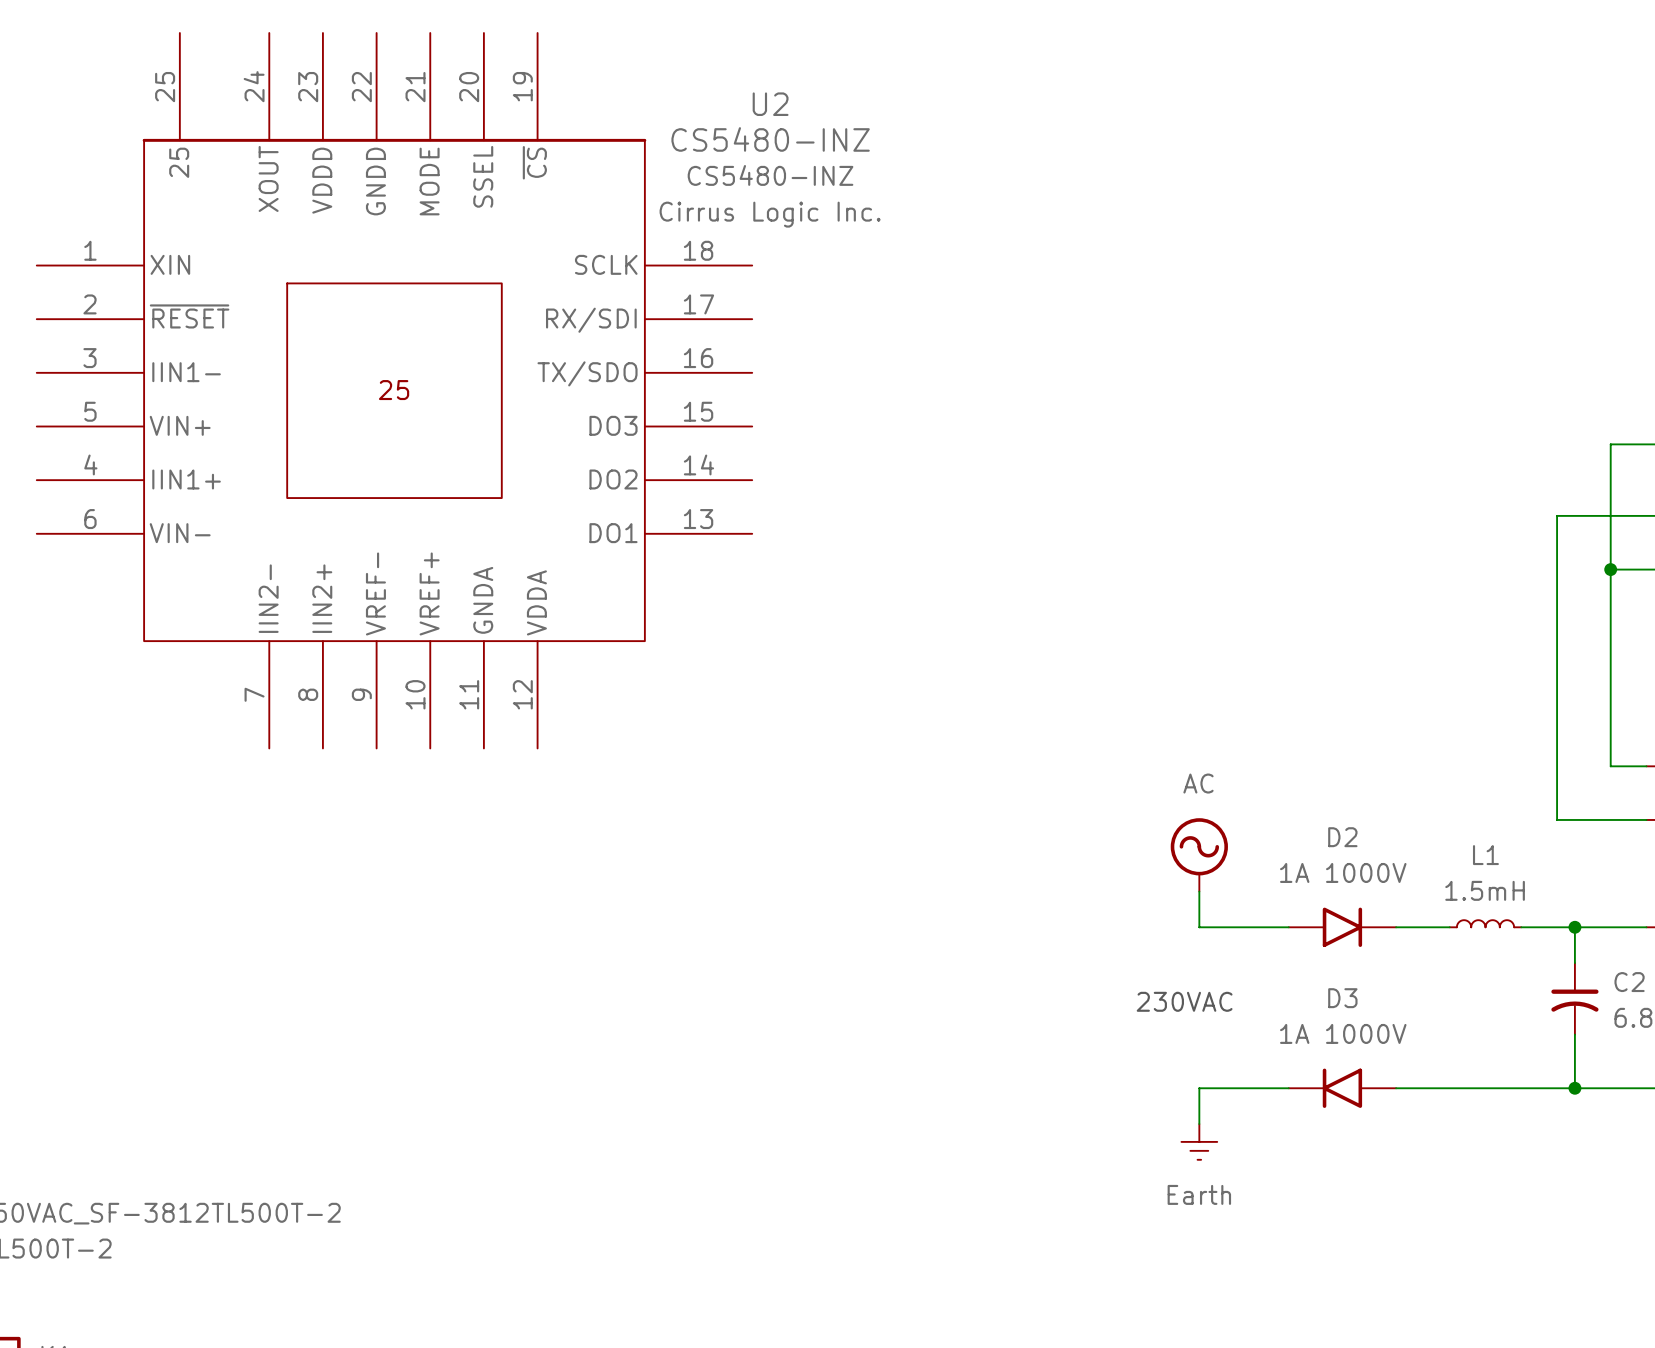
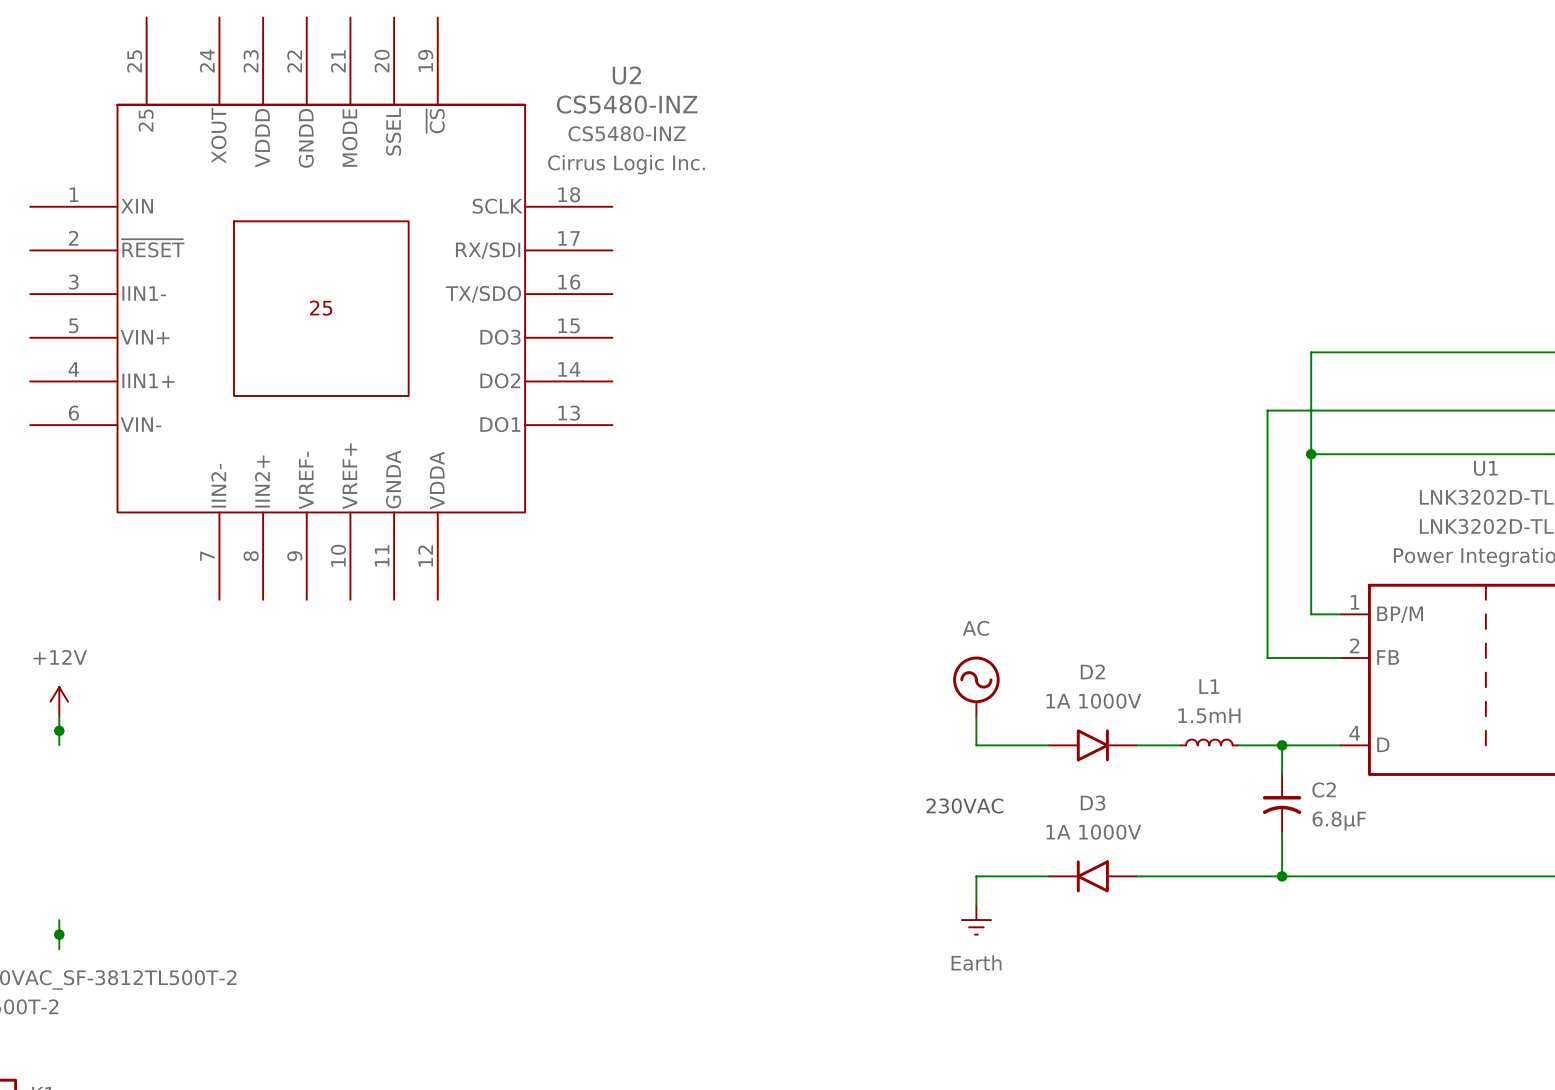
power symbol: none -> +12V (59, 701)
wire: none -> (59, 716) (59, 745)
junction: none -> (59, 730)
wire: none -> (59, 920) (59, 949)
junction: none -> (59, 934)

